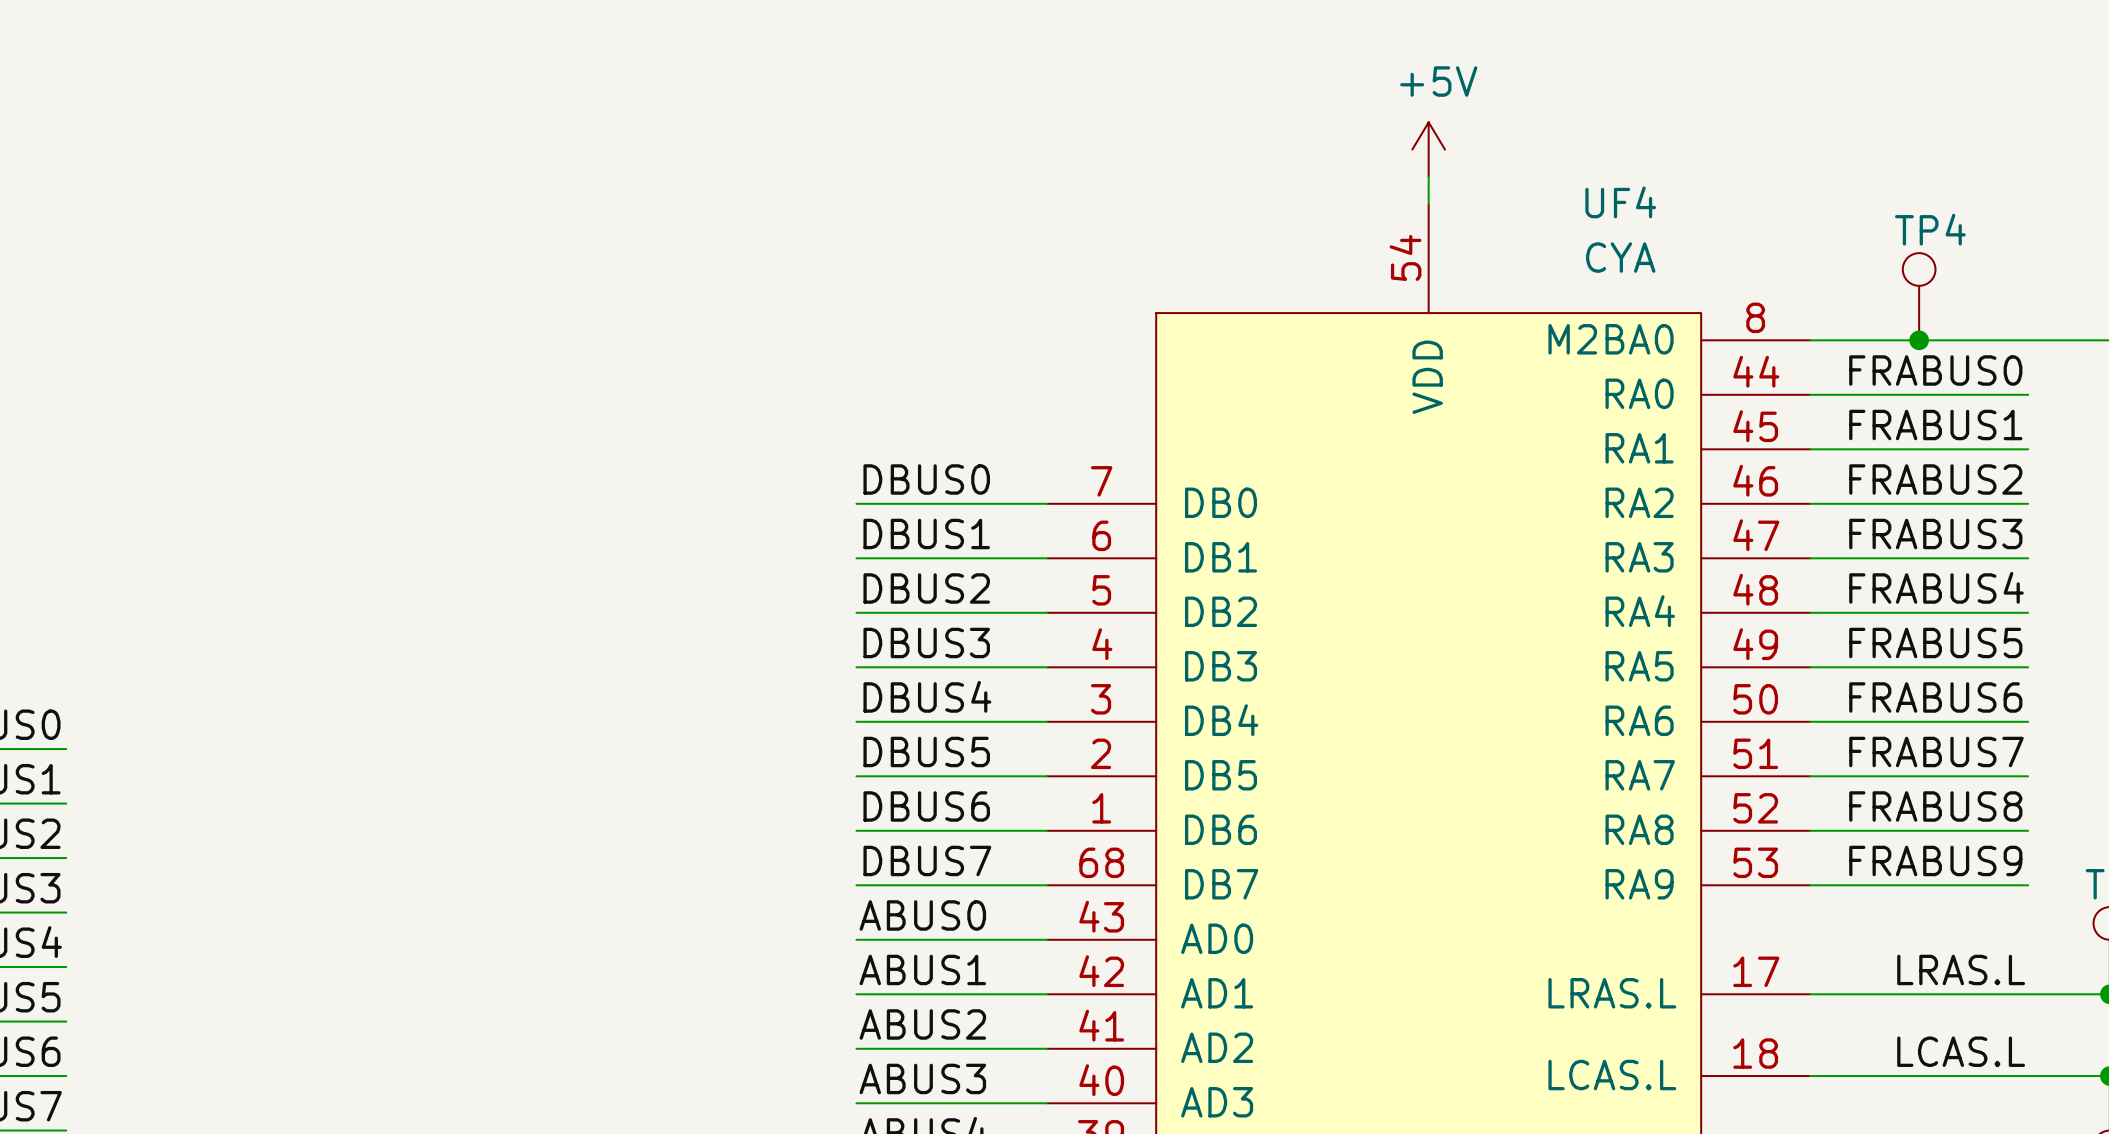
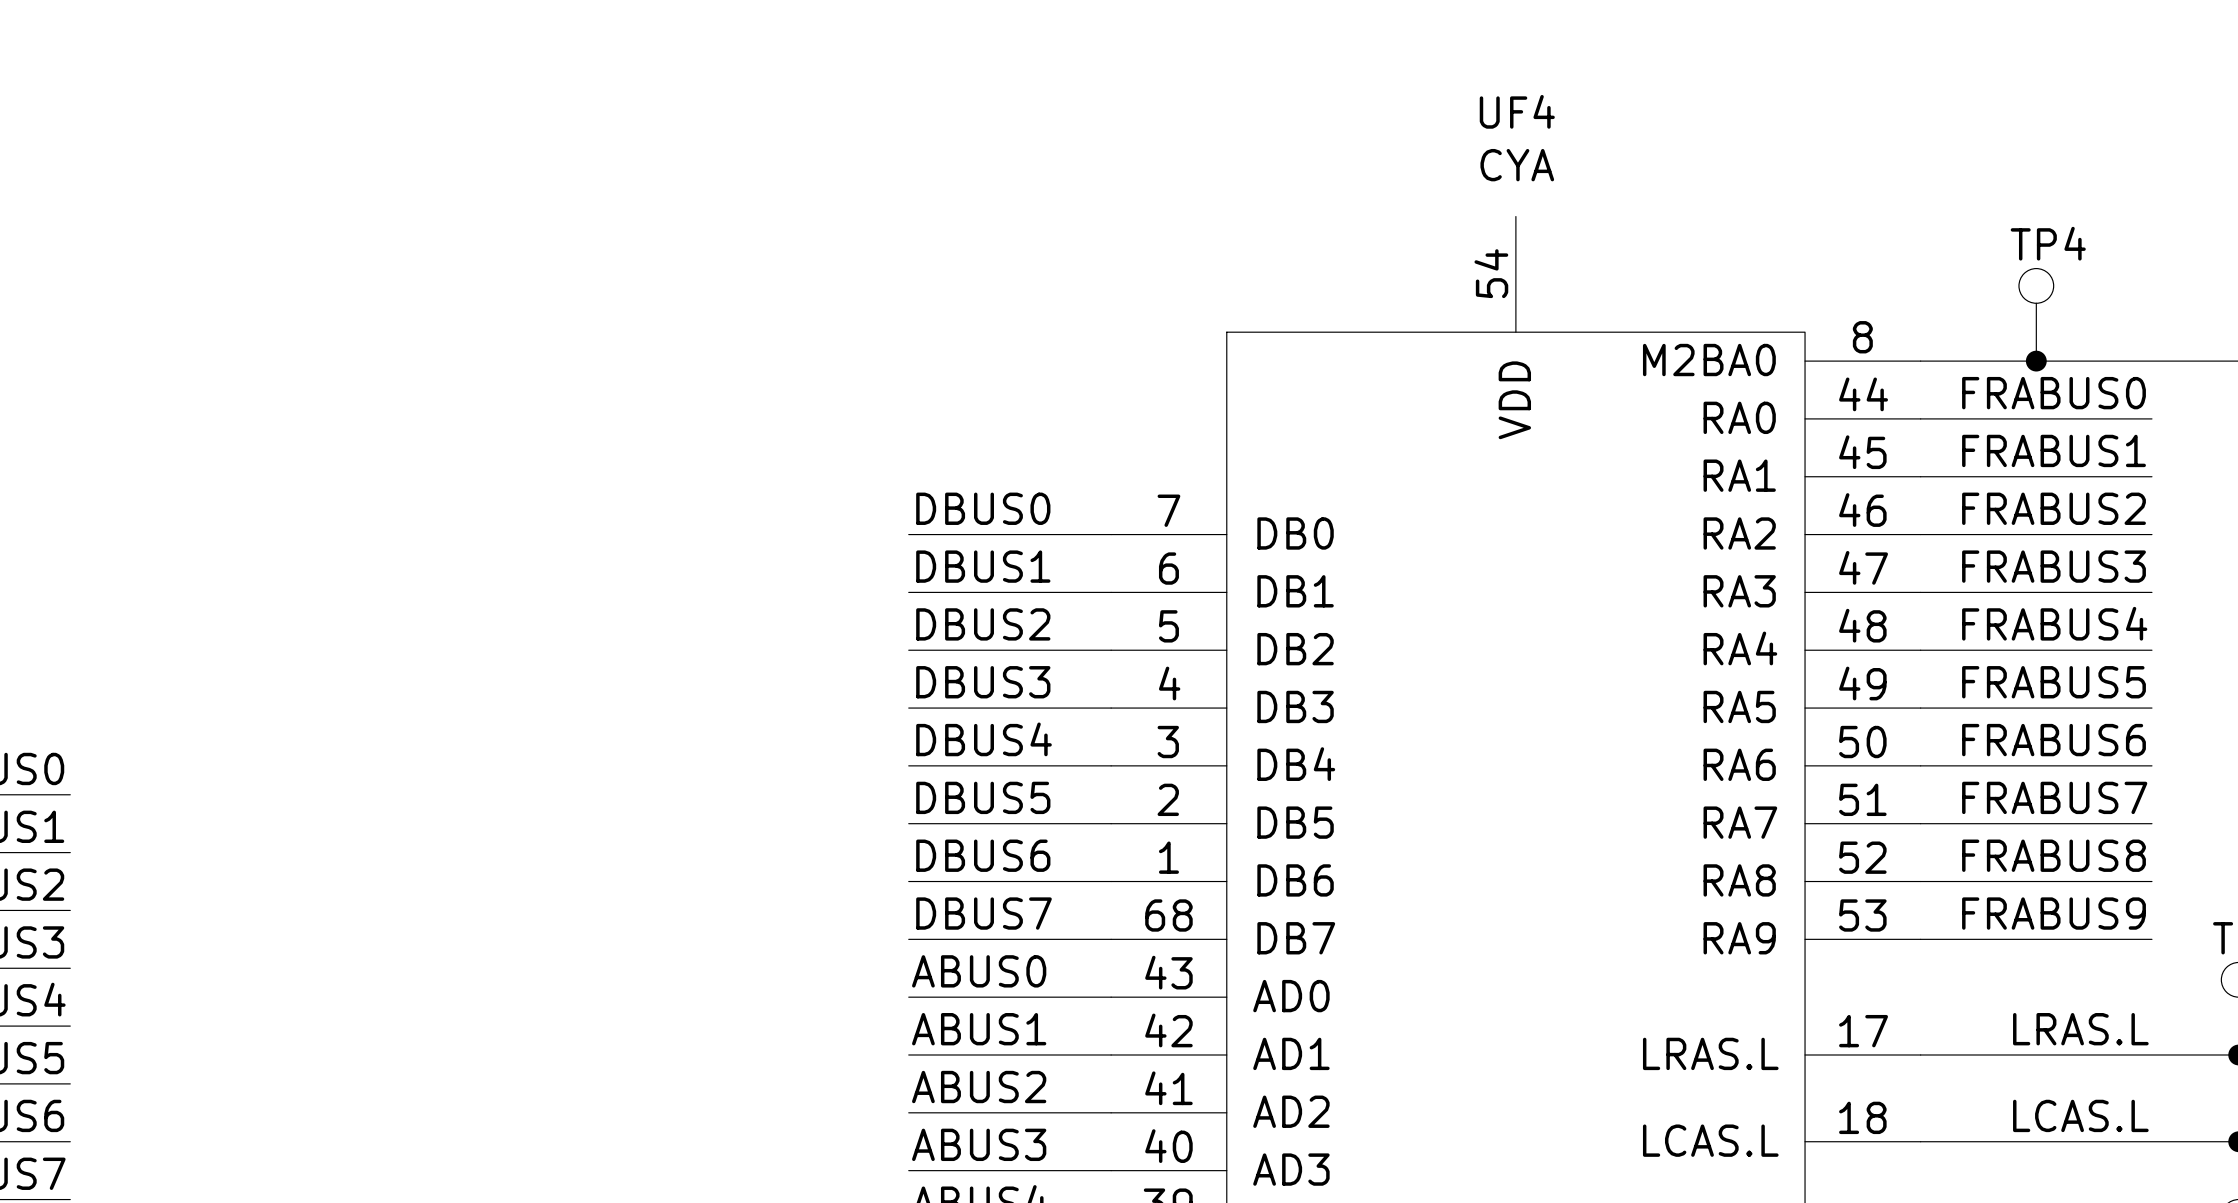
power symbol: +5V (1428, 149) -> none
wire: (1428, 176) (1428, 204) -> none
UF4 name position: UF4 (1620, 202) -> UF4 (1517, 111)
UF4 value position: CYA (1620, 257) -> CYA (1517, 165)

